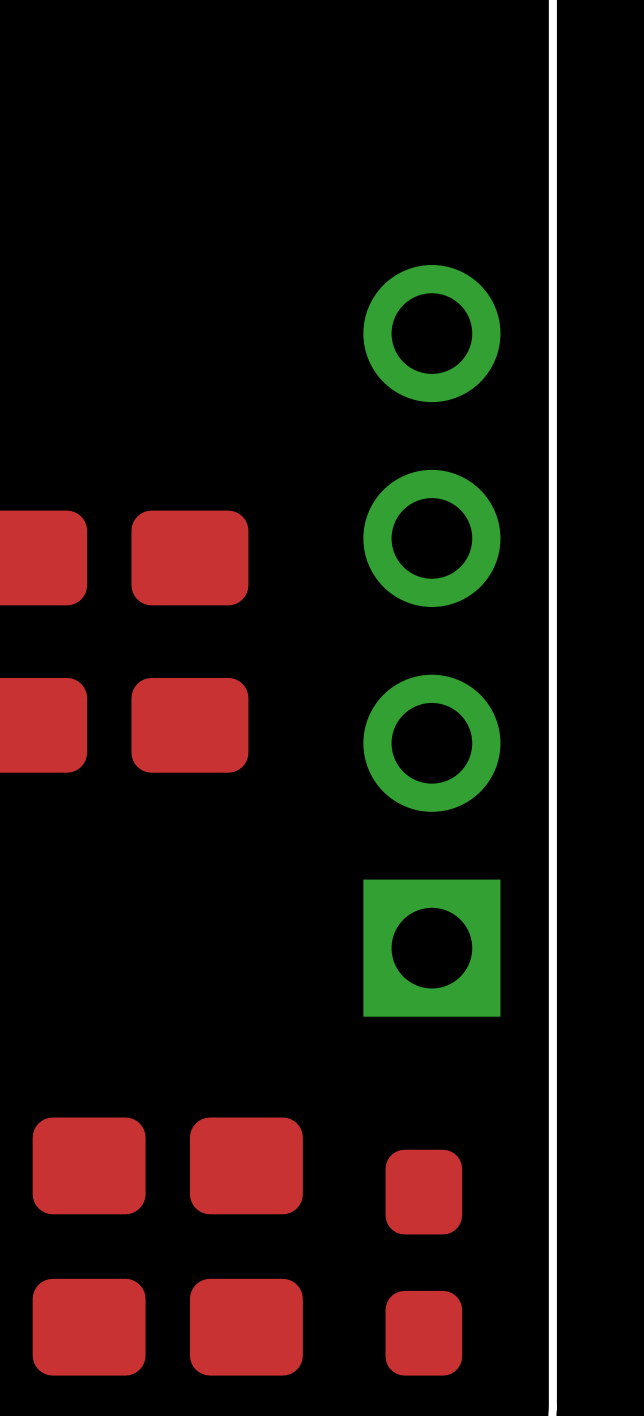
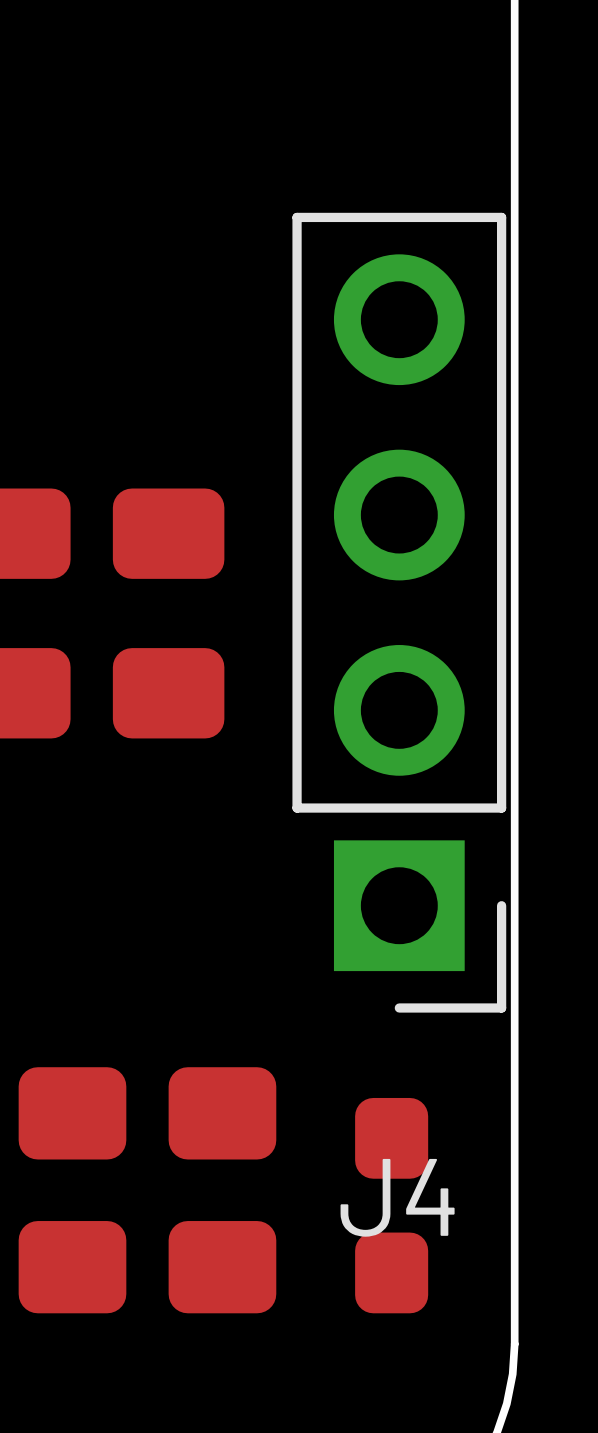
J4 side: top (431, 640) -> bottom (399, 612)

